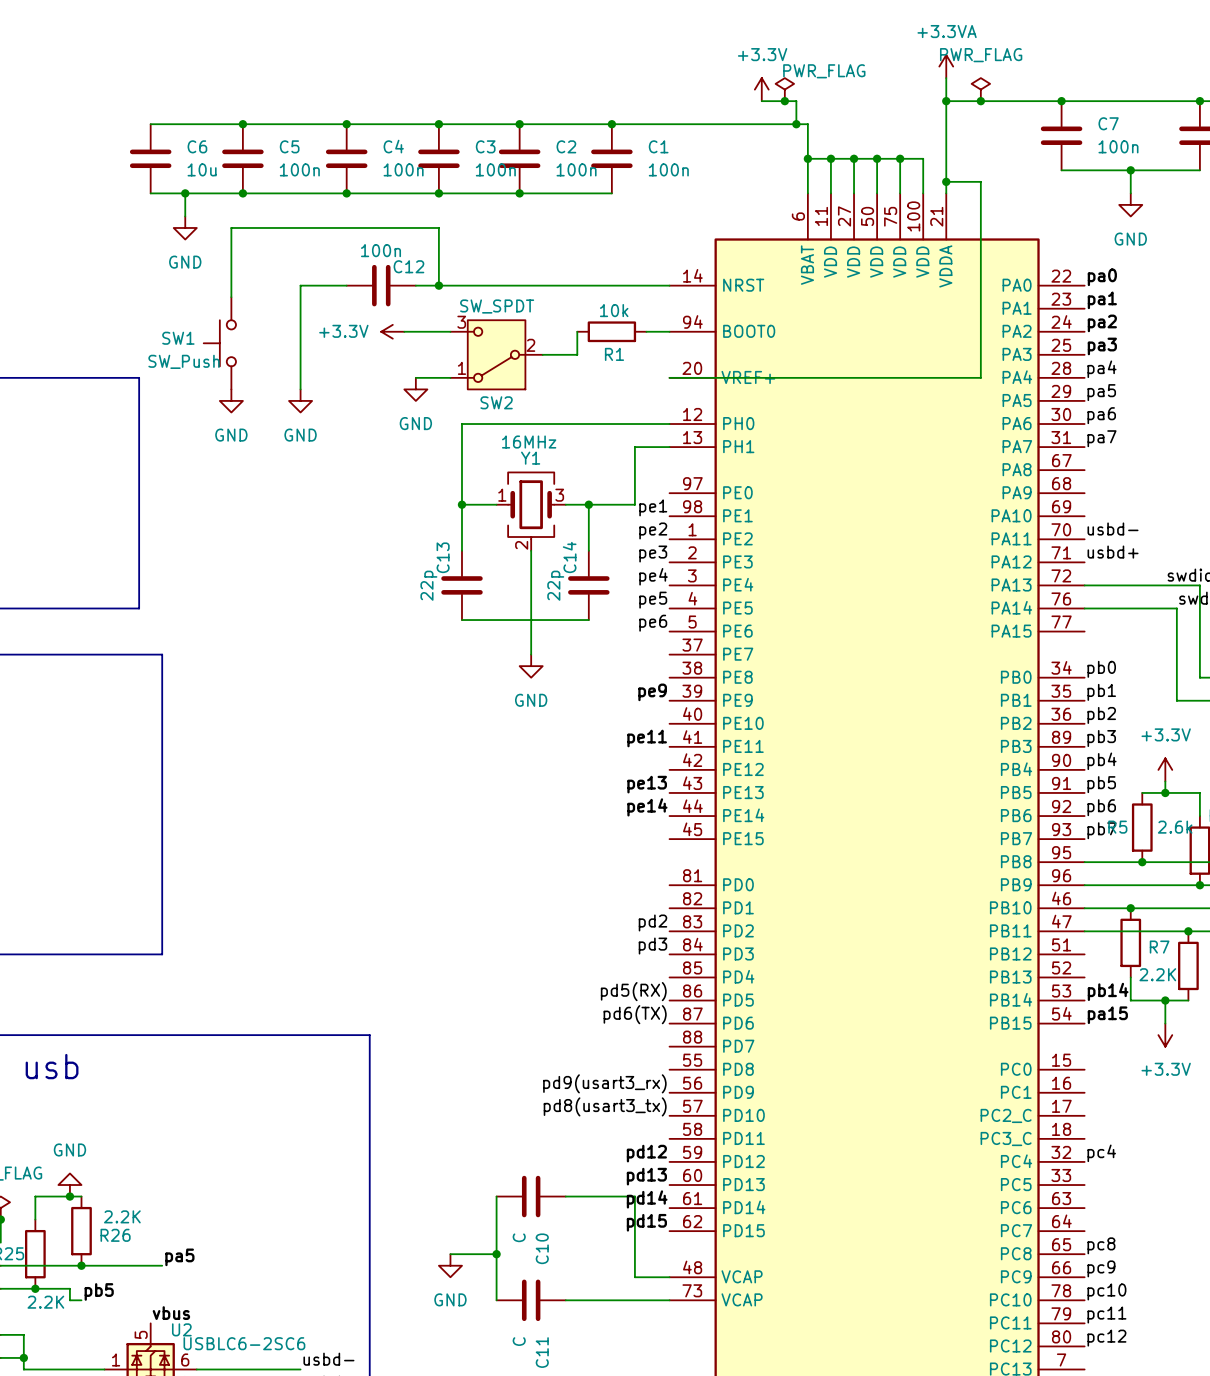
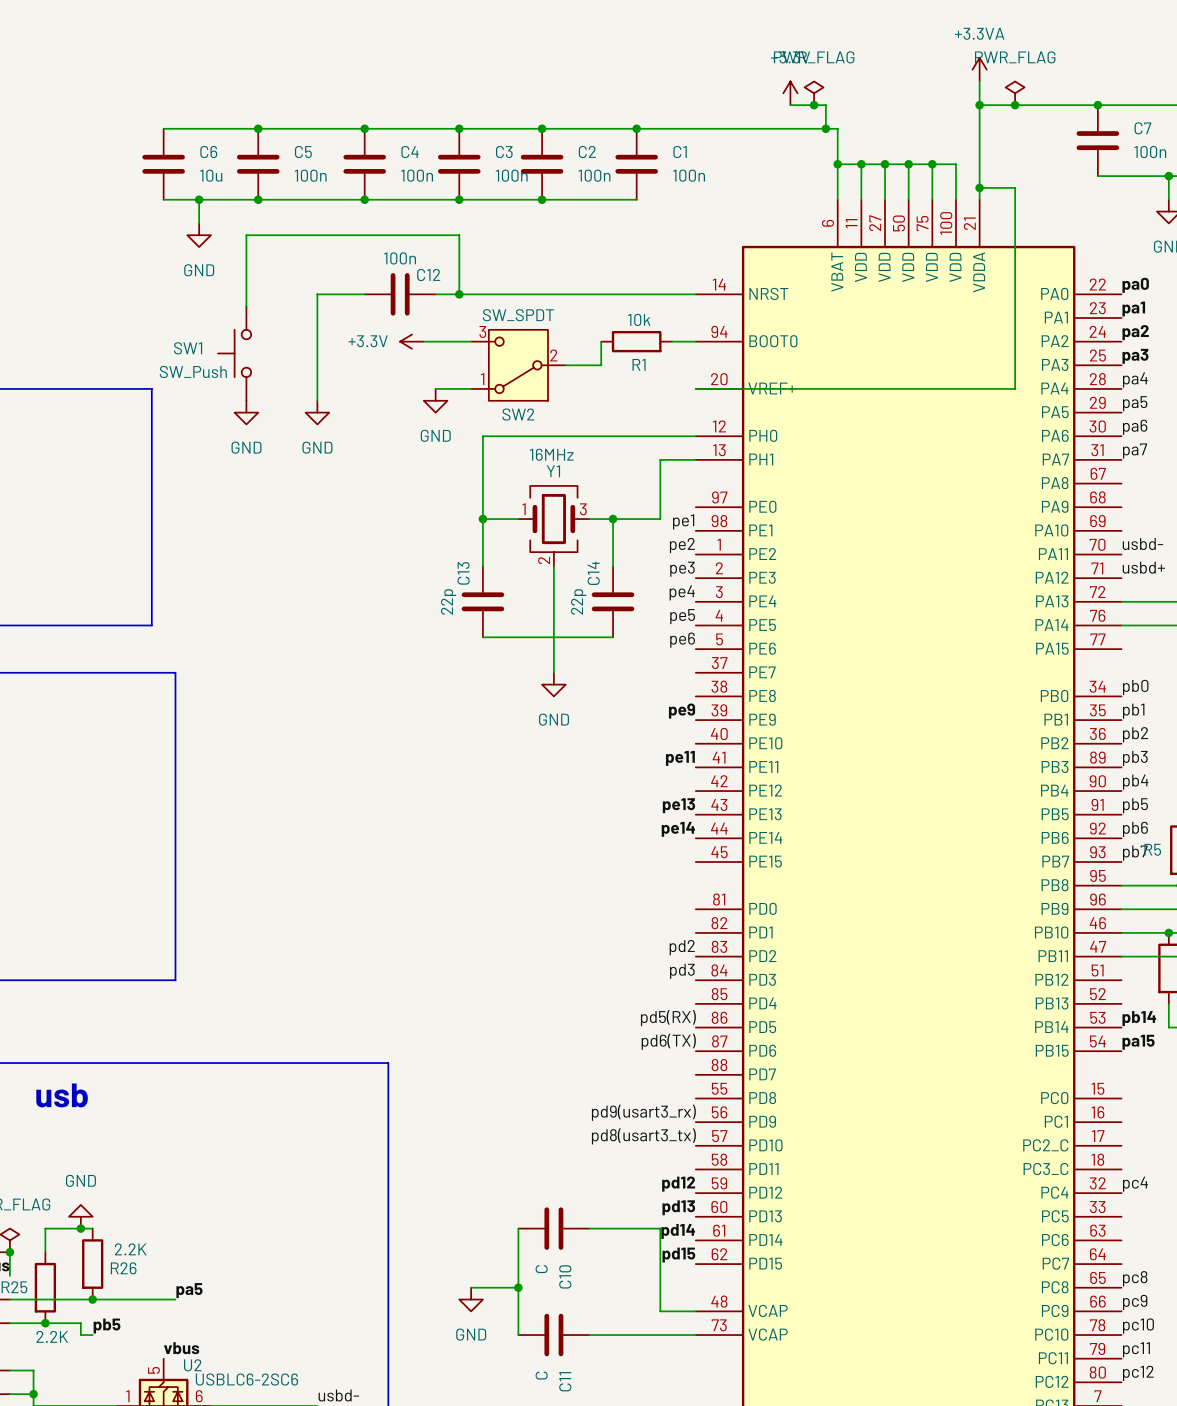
power symbol text position: PWR_FLAG (824, 71) -> PWR_FLAG (814, 57)

